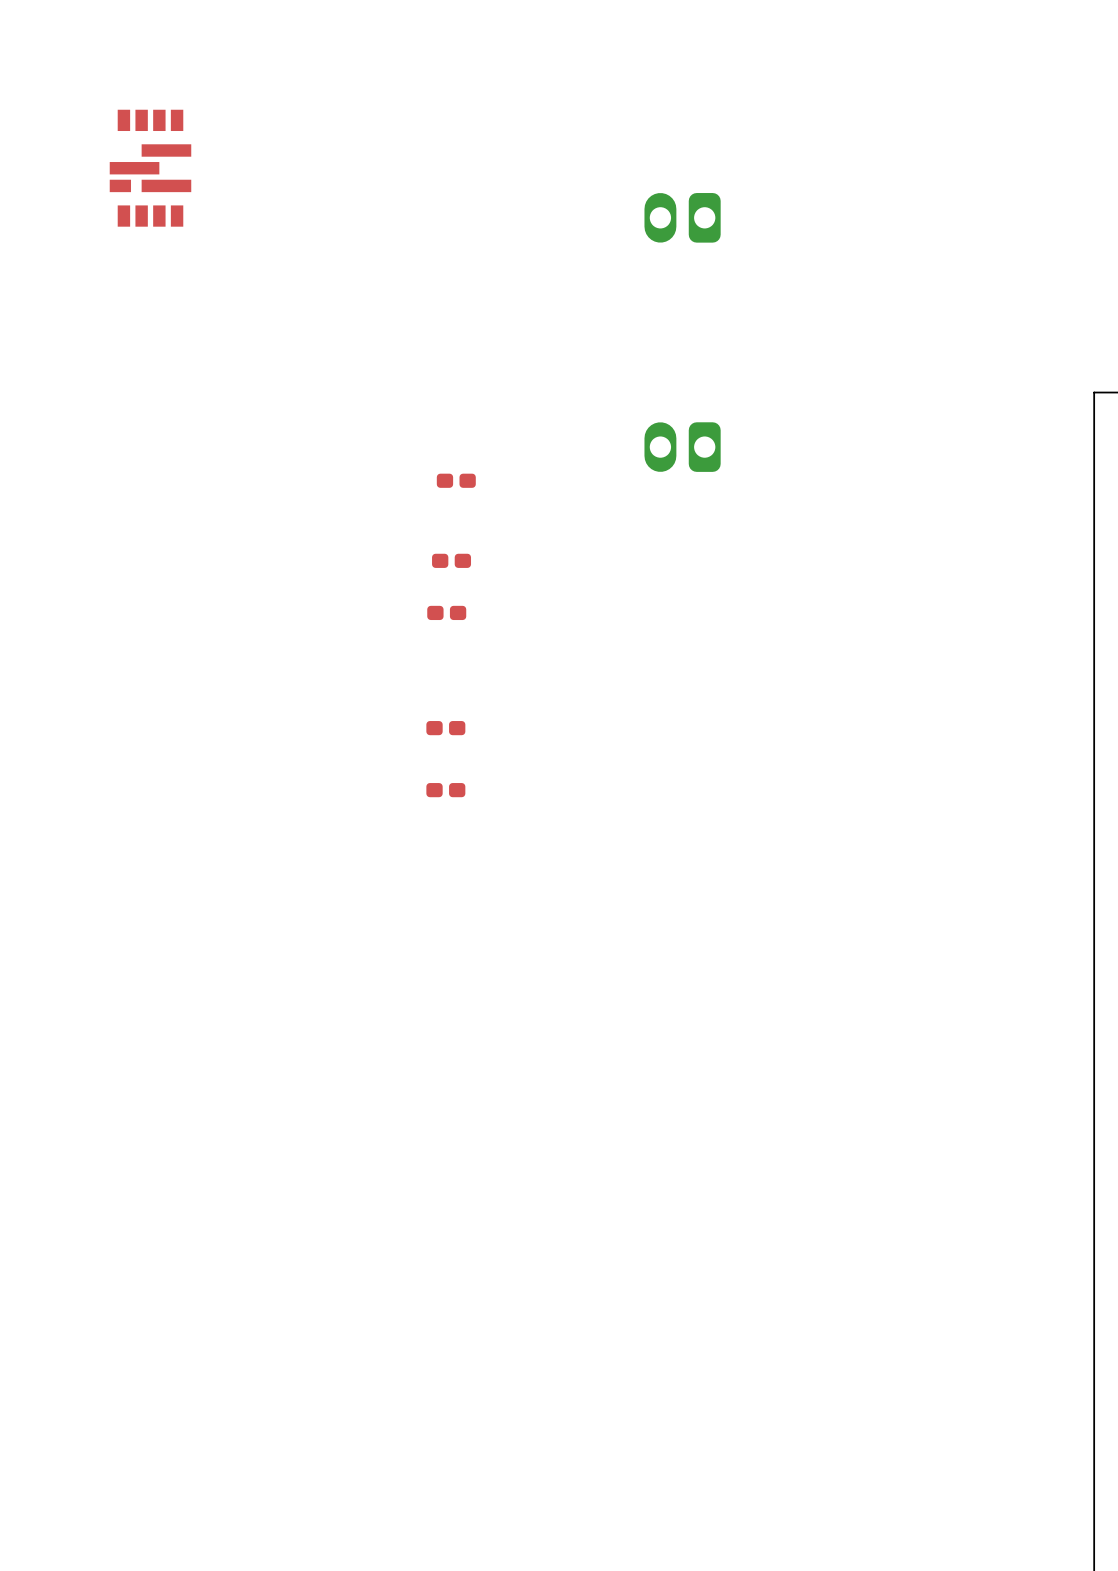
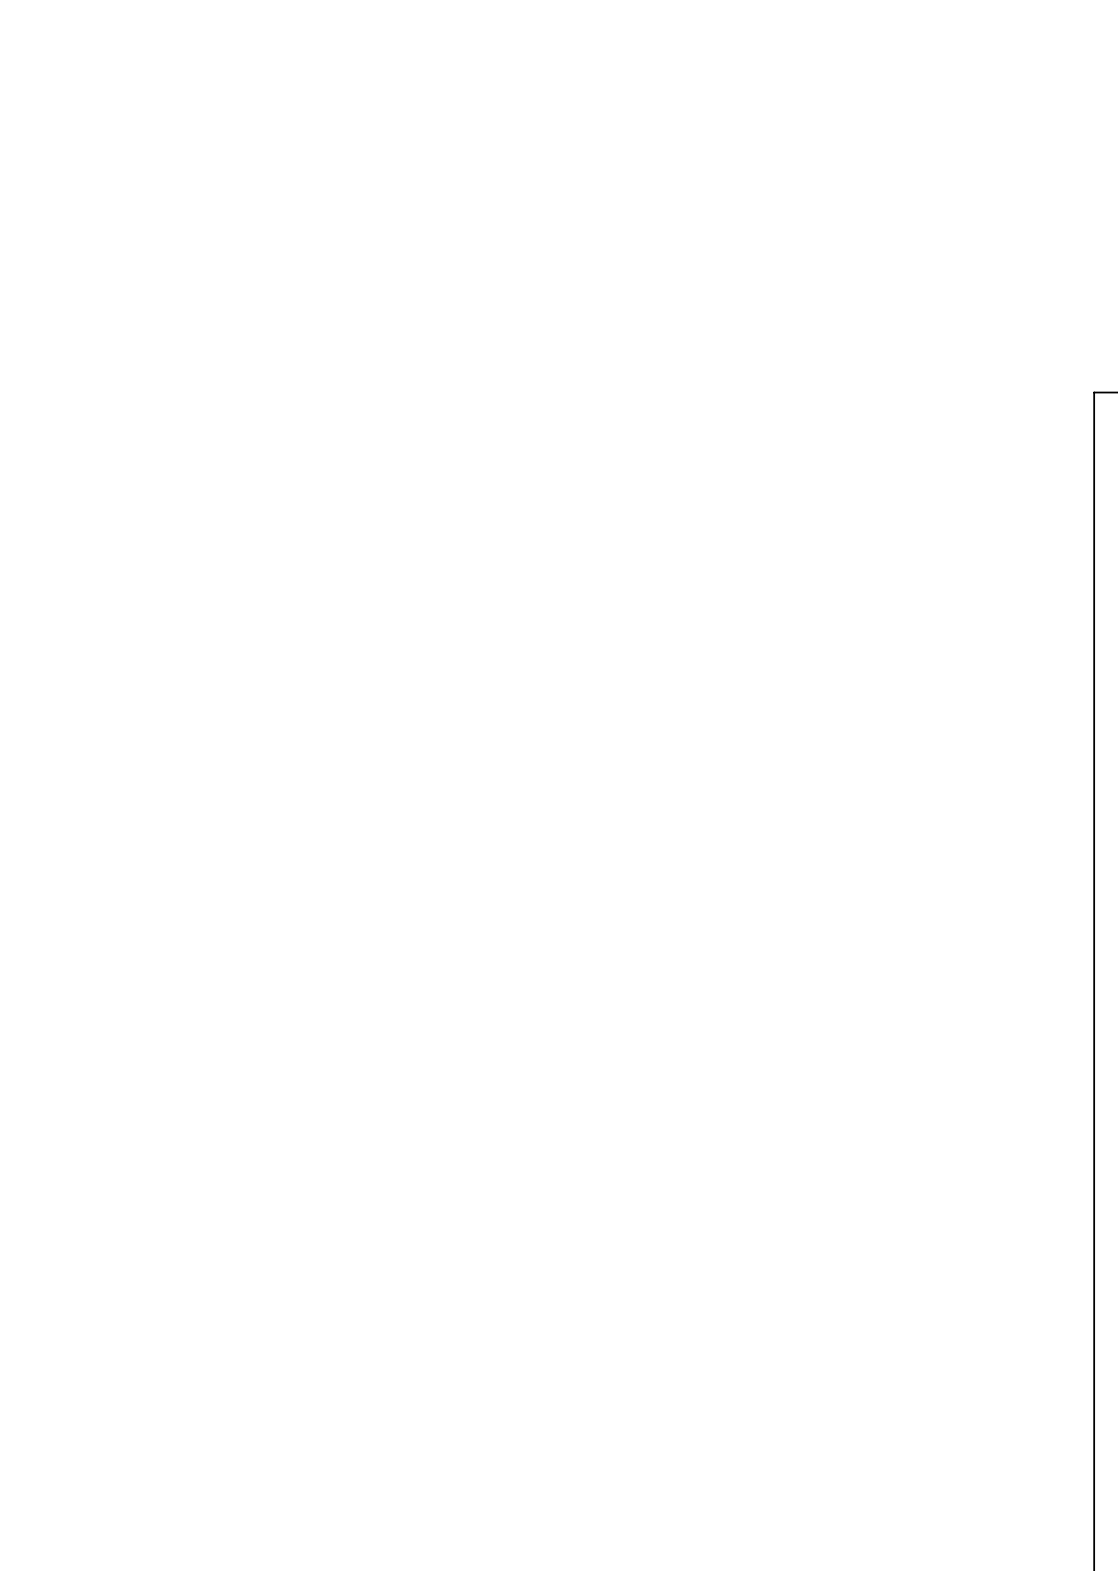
part: (150, 168) -> none
part: (682, 217) -> none
part: (682, 447) -> none
part: (456, 480) -> none
part: (451, 560) -> none
part: (446, 612) -> none
part: (445, 728) -> none
part: (445, 790) -> none

